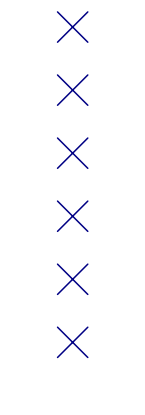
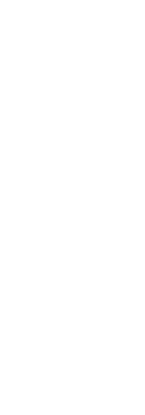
no-connect mark: (72, 27) -> none
no-connect mark: (72, 90) -> none
no-connect mark: (72, 153) -> none
no-connect mark: (72, 216) -> none
no-connect mark: (72, 279) -> none
no-connect mark: (72, 342) -> none

